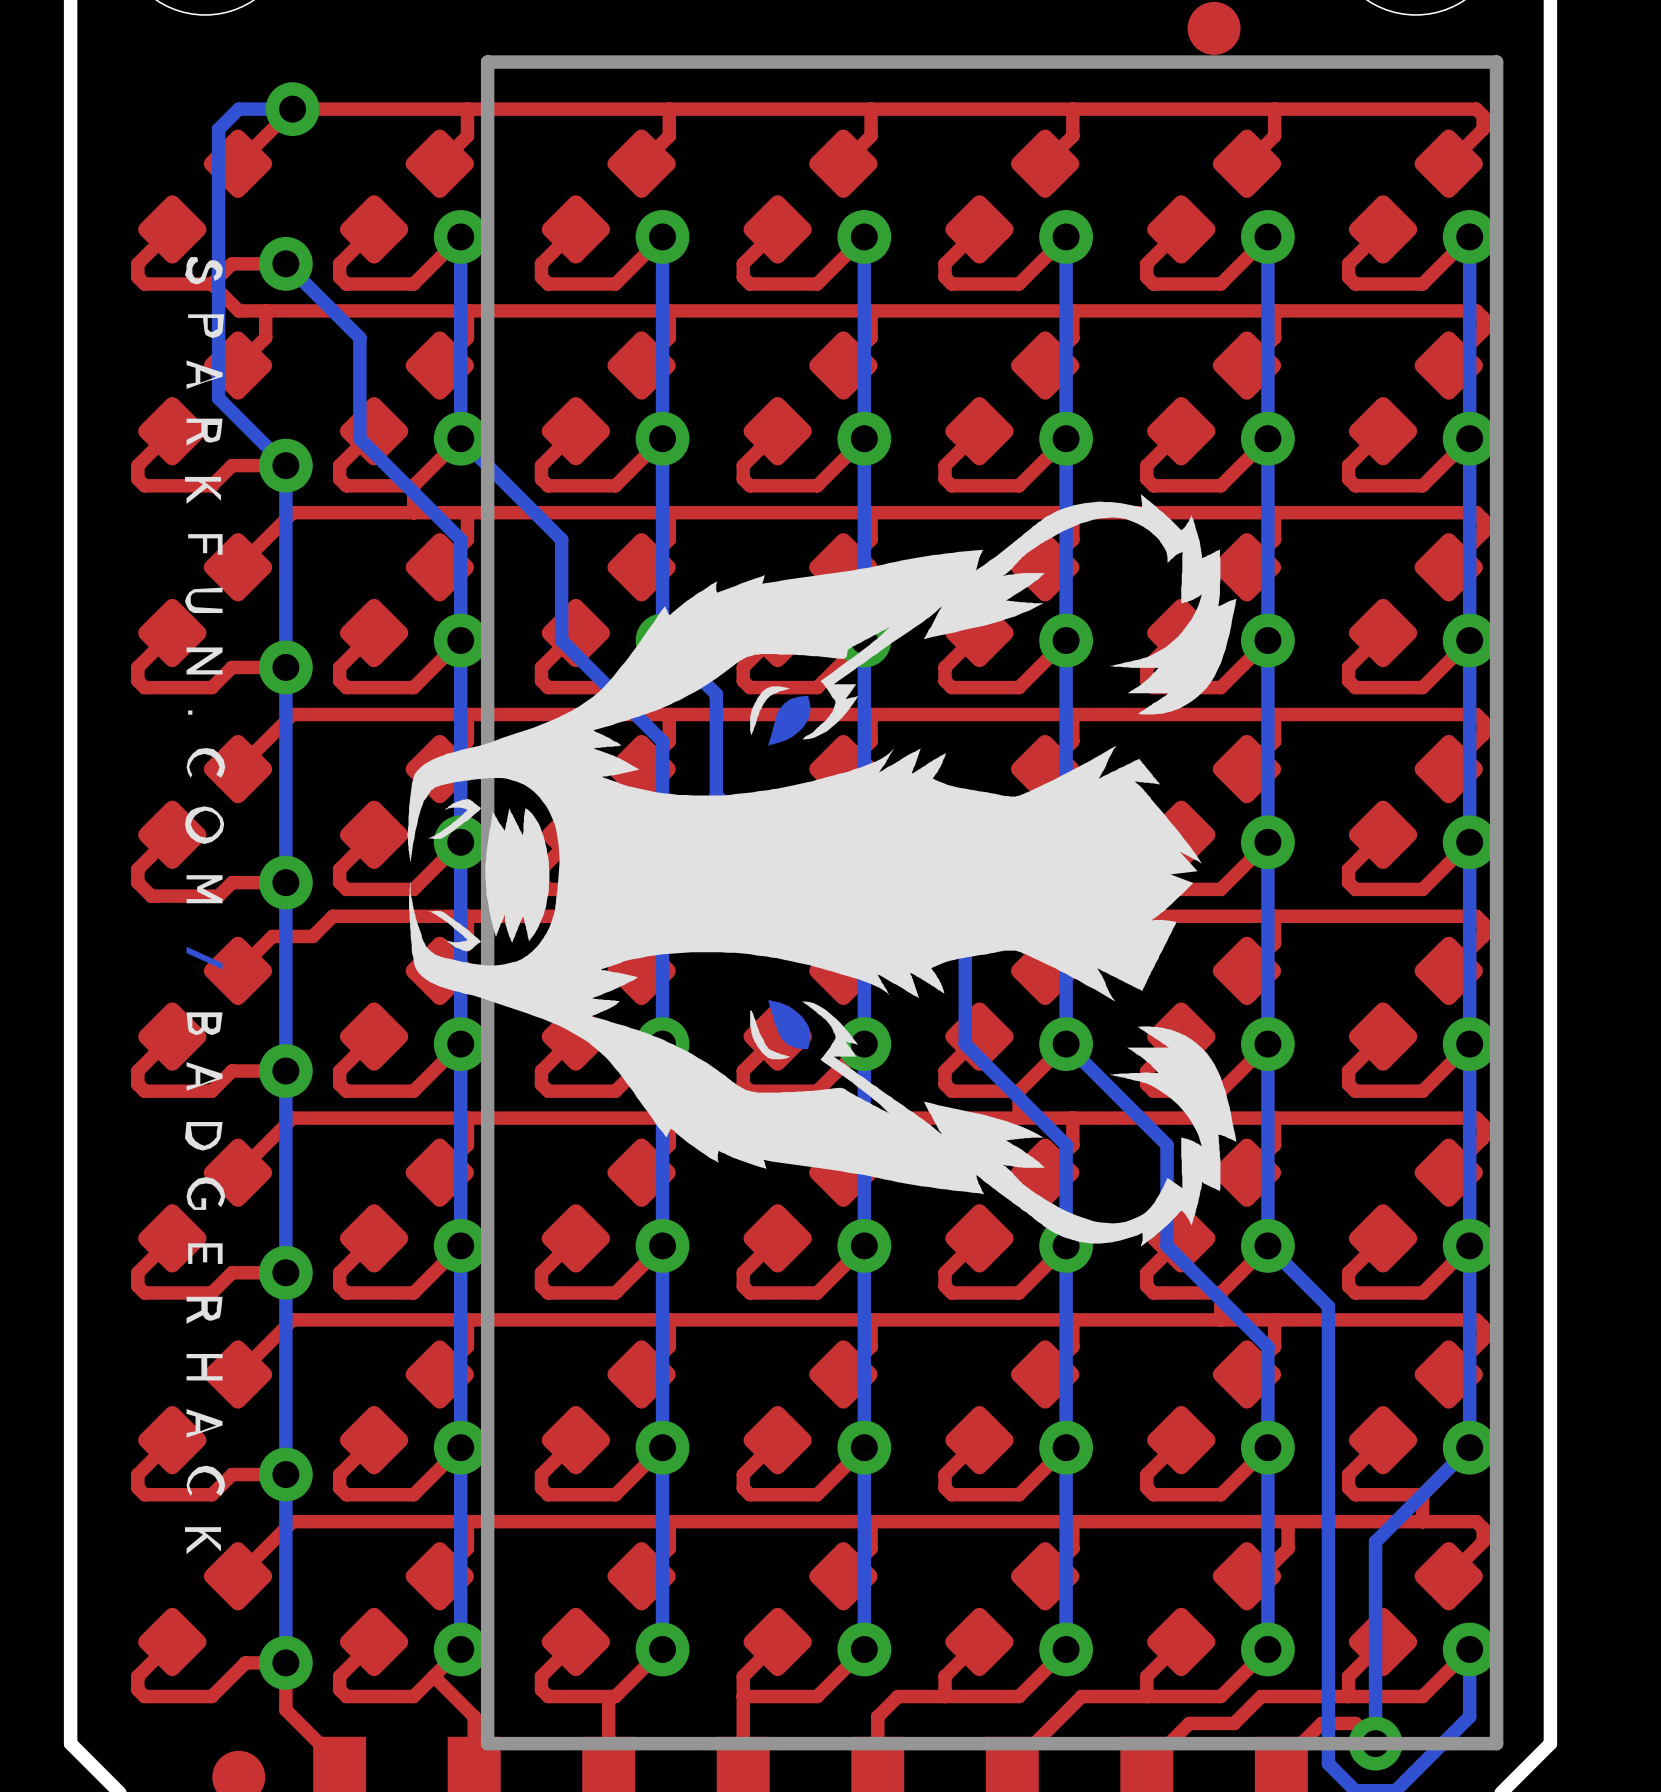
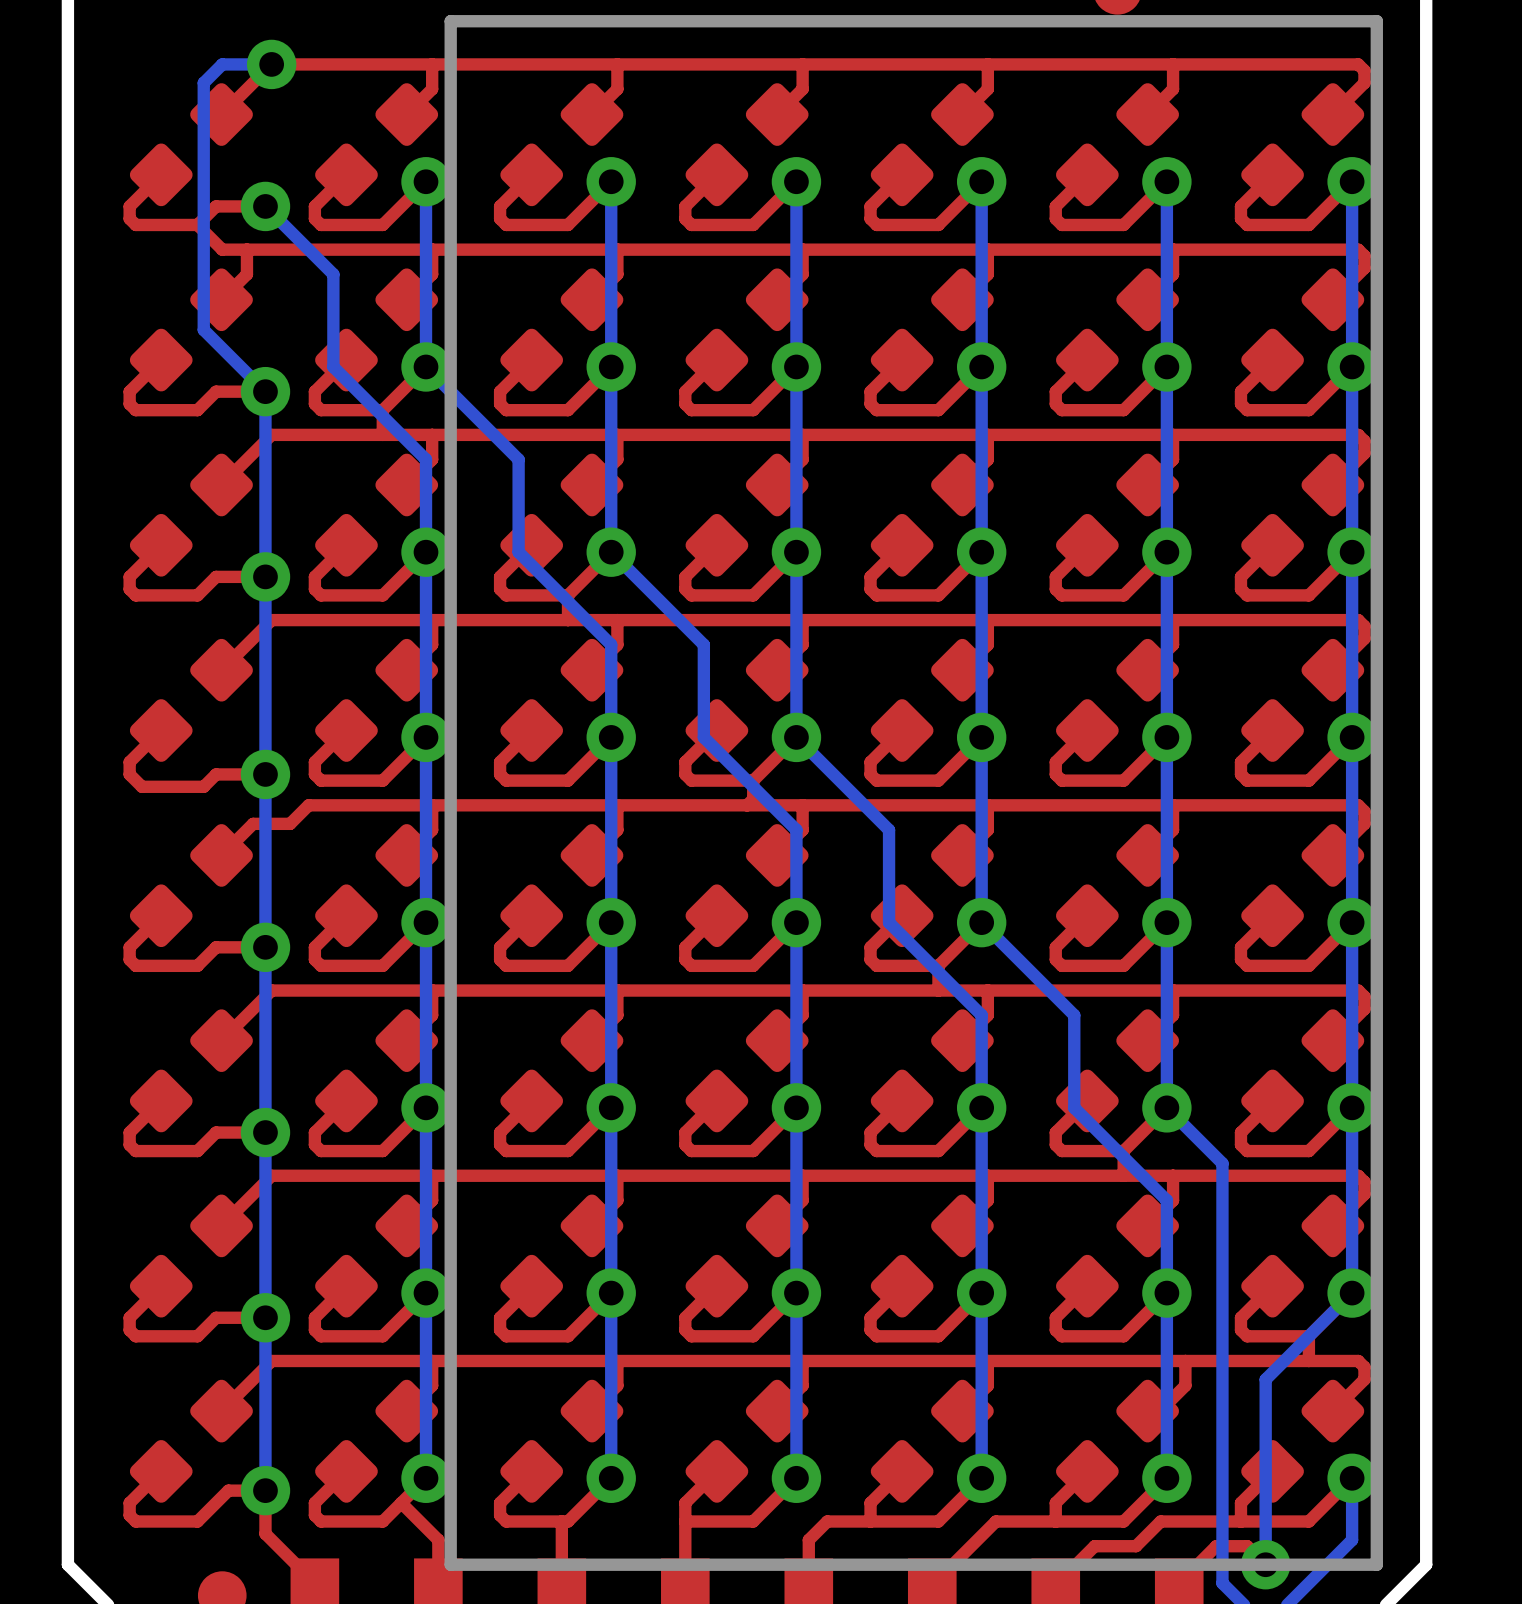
drawing: [184, 257, 226, 1555] -> none
drawing: [407, 494, 1237, 1247] -> none
bottom track: (716, 694) (716, 795) (763, 842) -> (660, 601) (703, 644) (703, 737)

